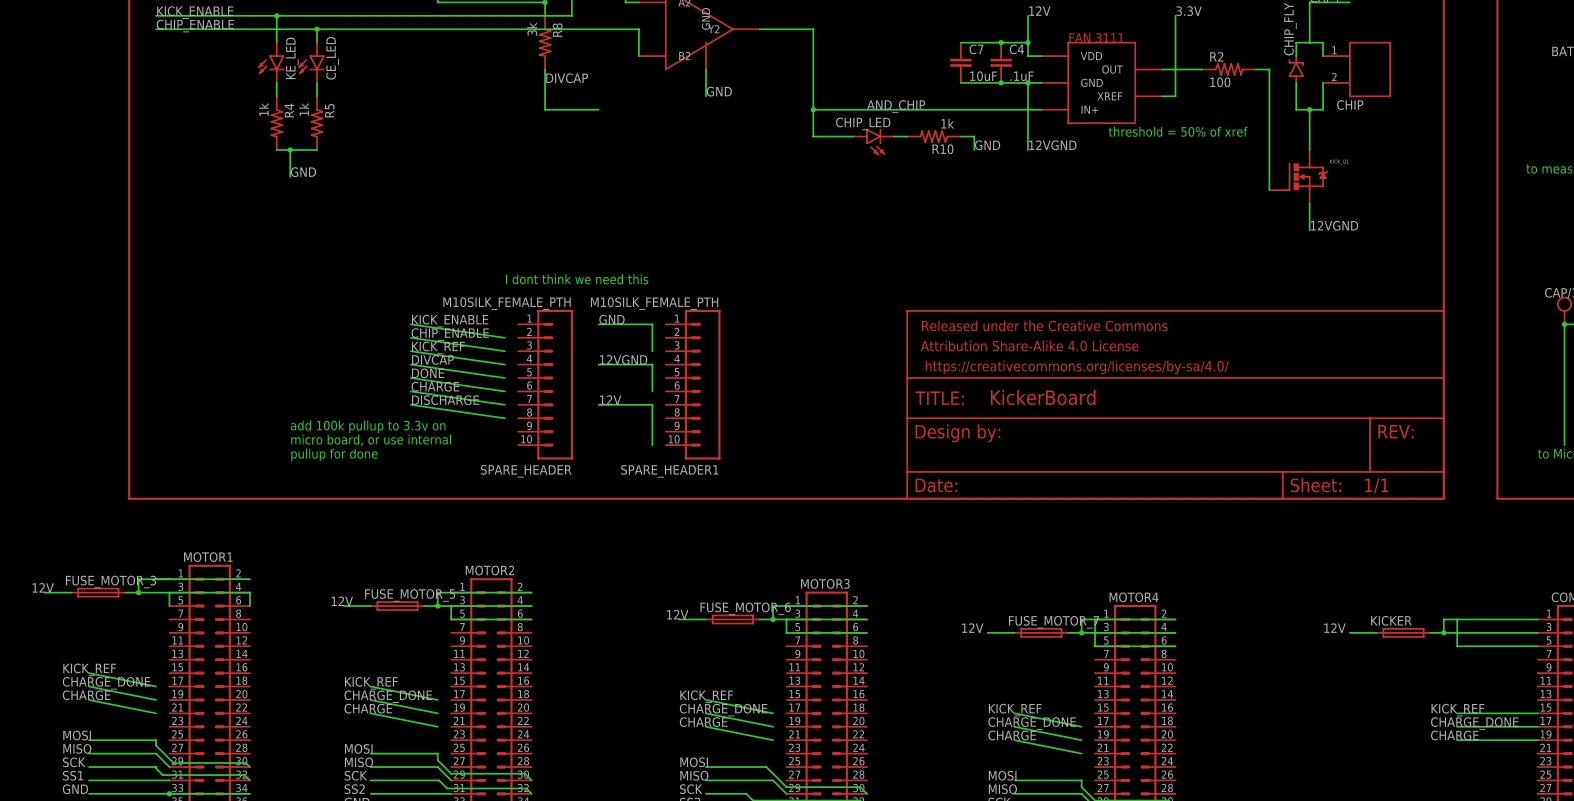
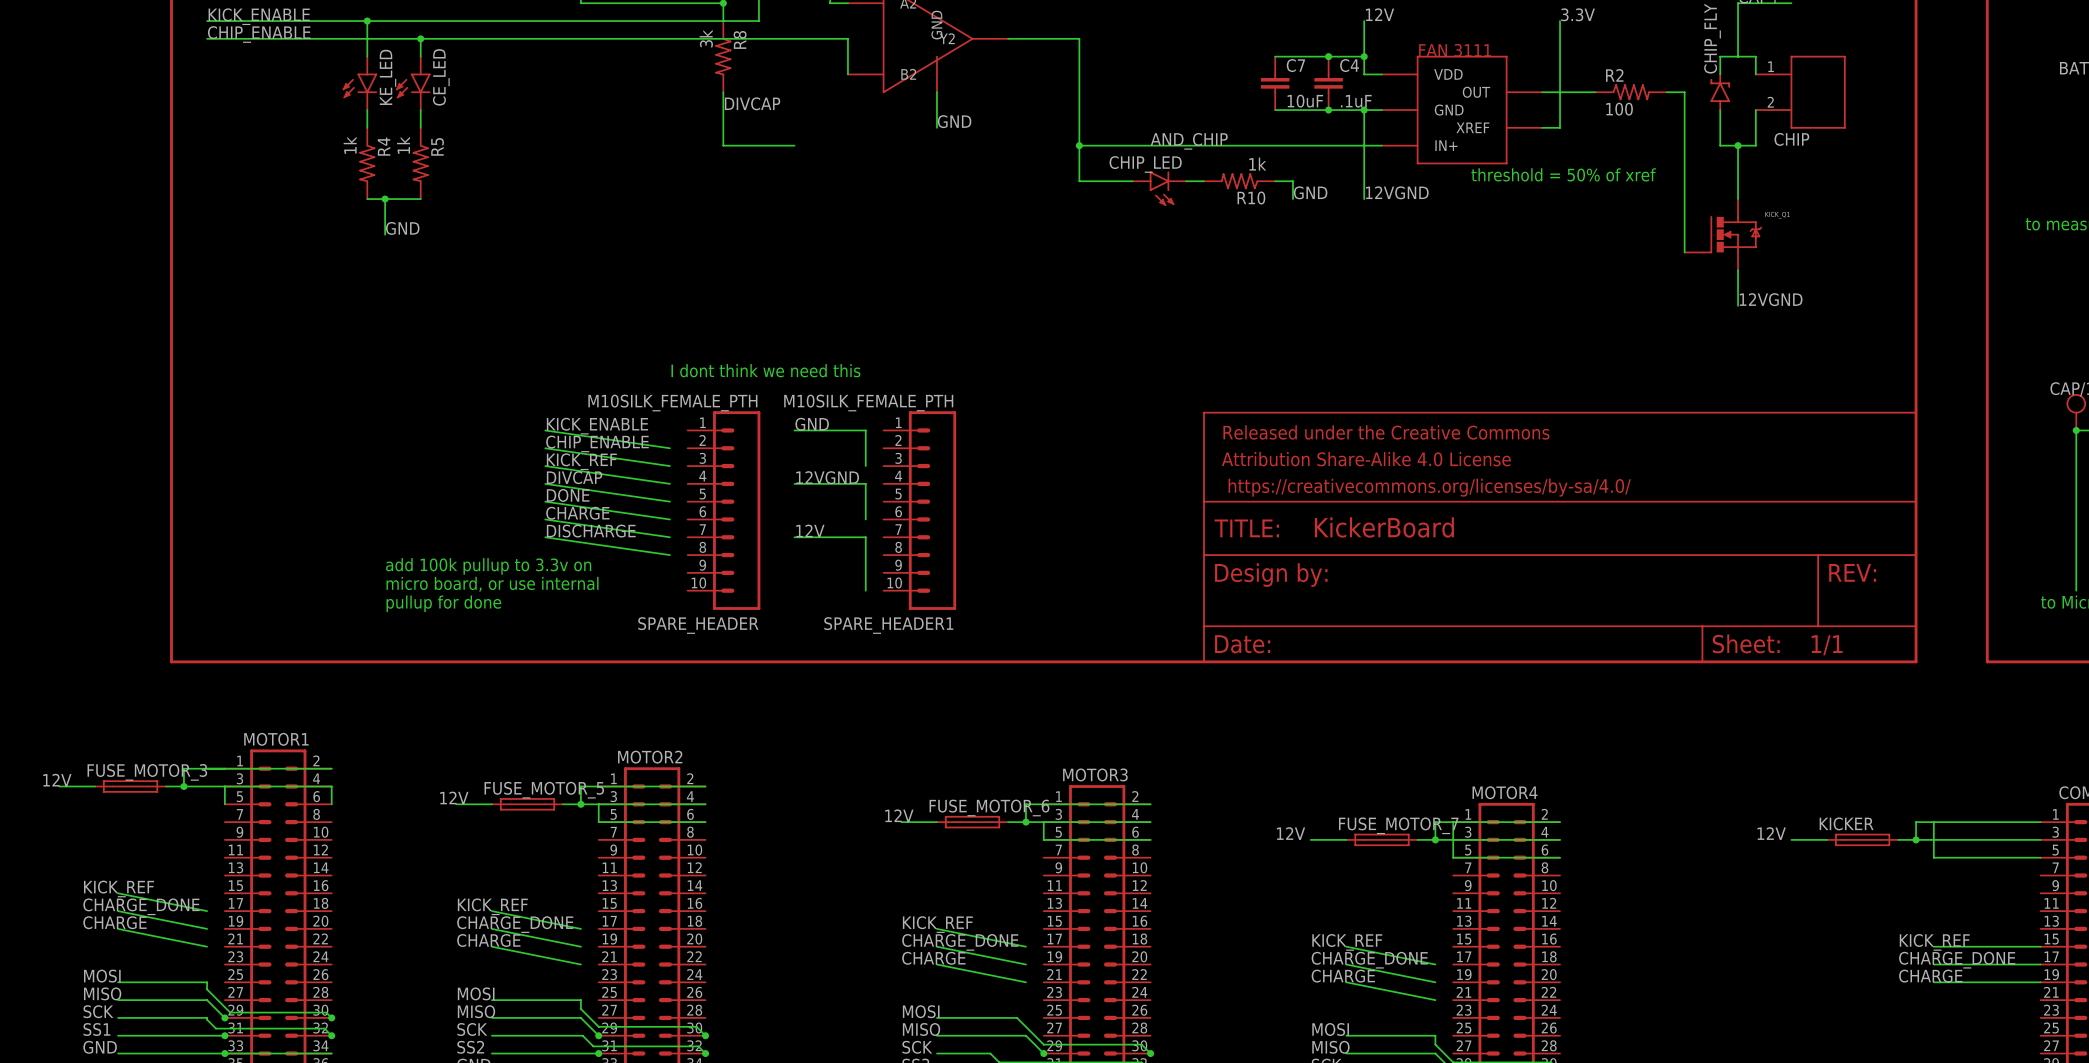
junction: none -> (224, 1017)
junction: none -> (331, 1017)
junction: none -> (224, 1035)
junction: none -> (331, 1035)
junction: none -> (598, 1035)
junction: none -> (705, 1035)
junction: none -> (598, 1053)
junction: none -> (705, 1053)
junction: none -> (1043, 1053)
junction: none -> (1150, 1053)

